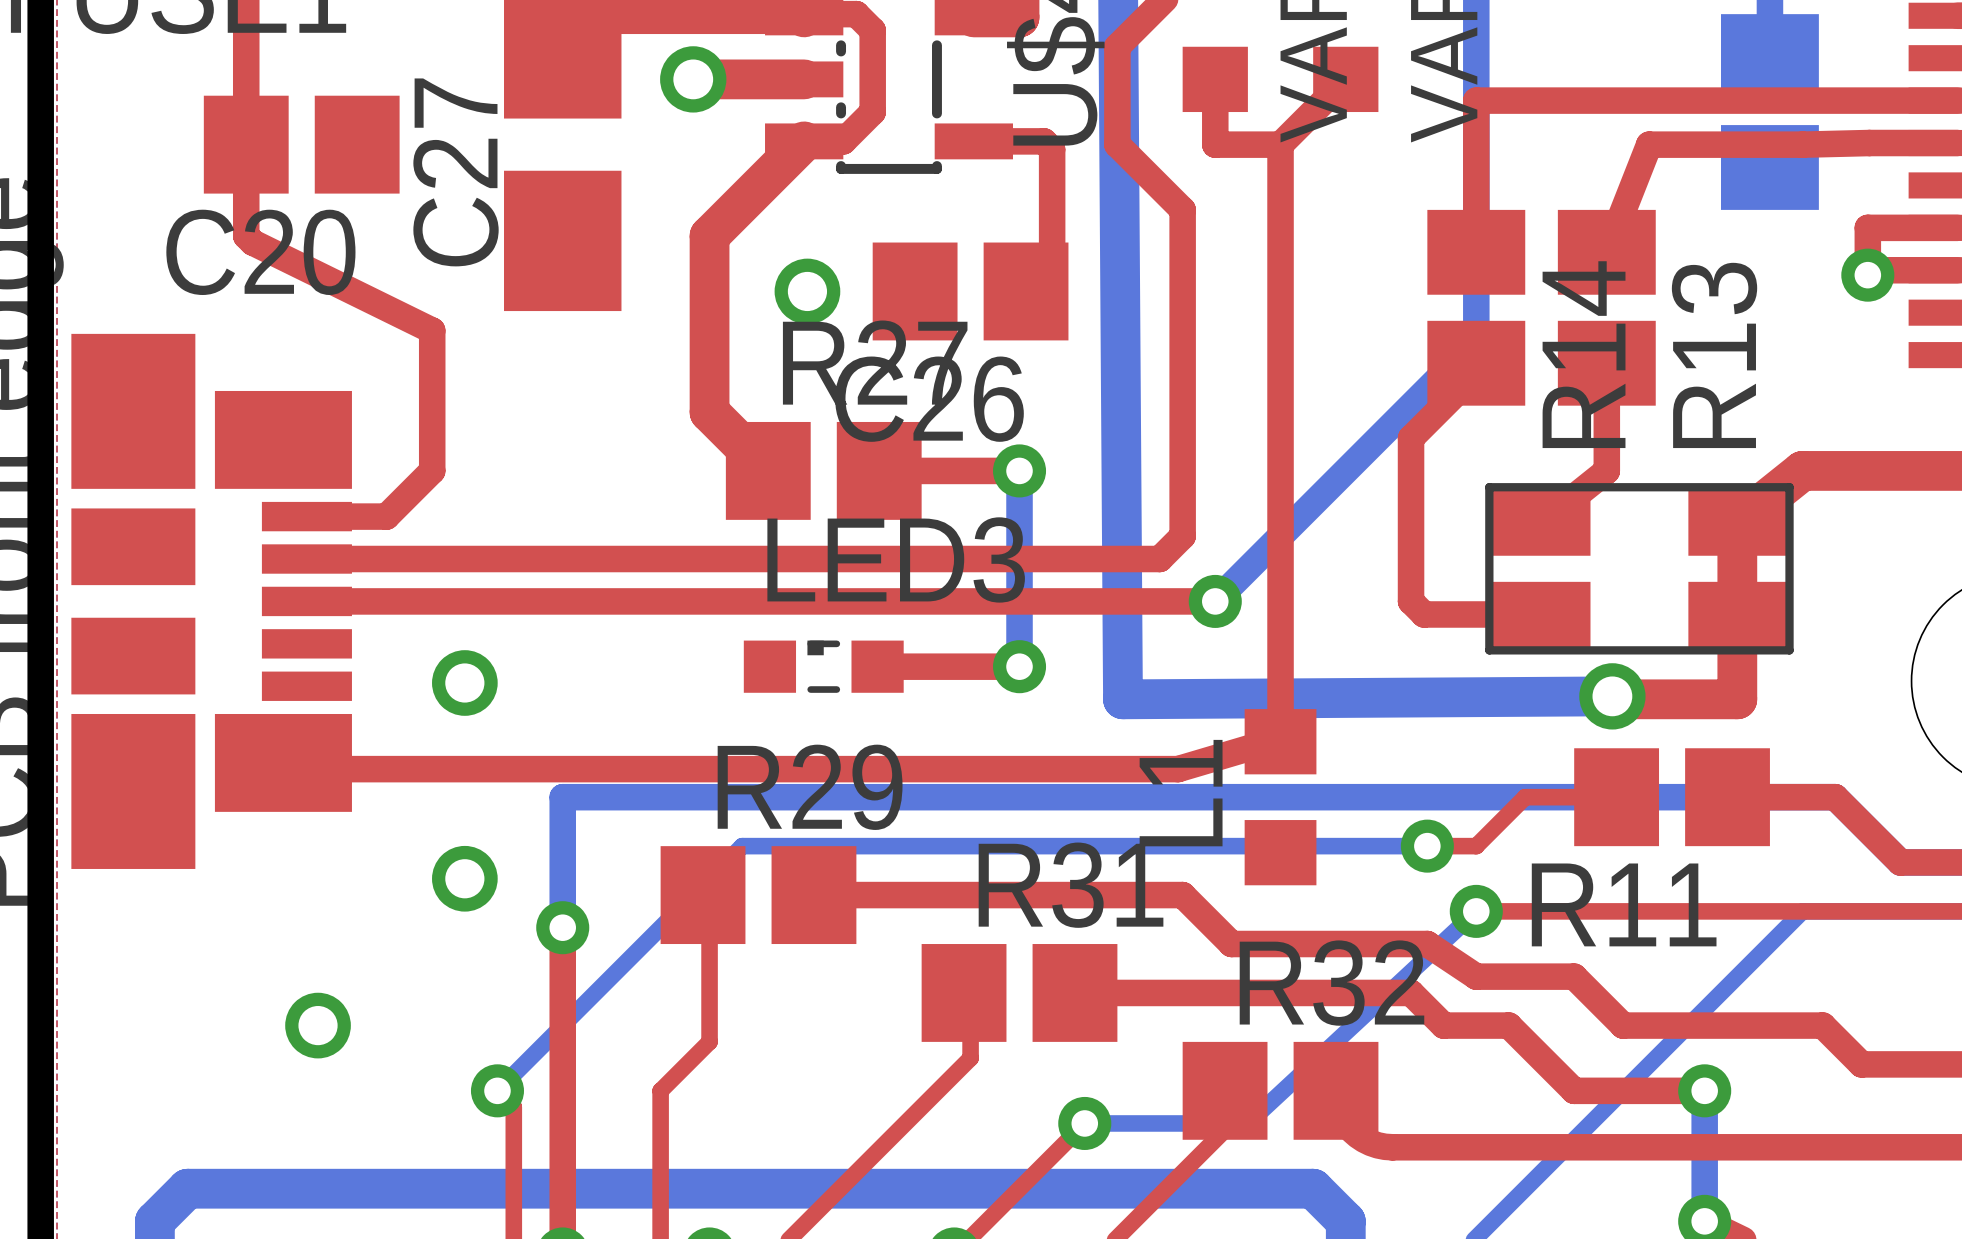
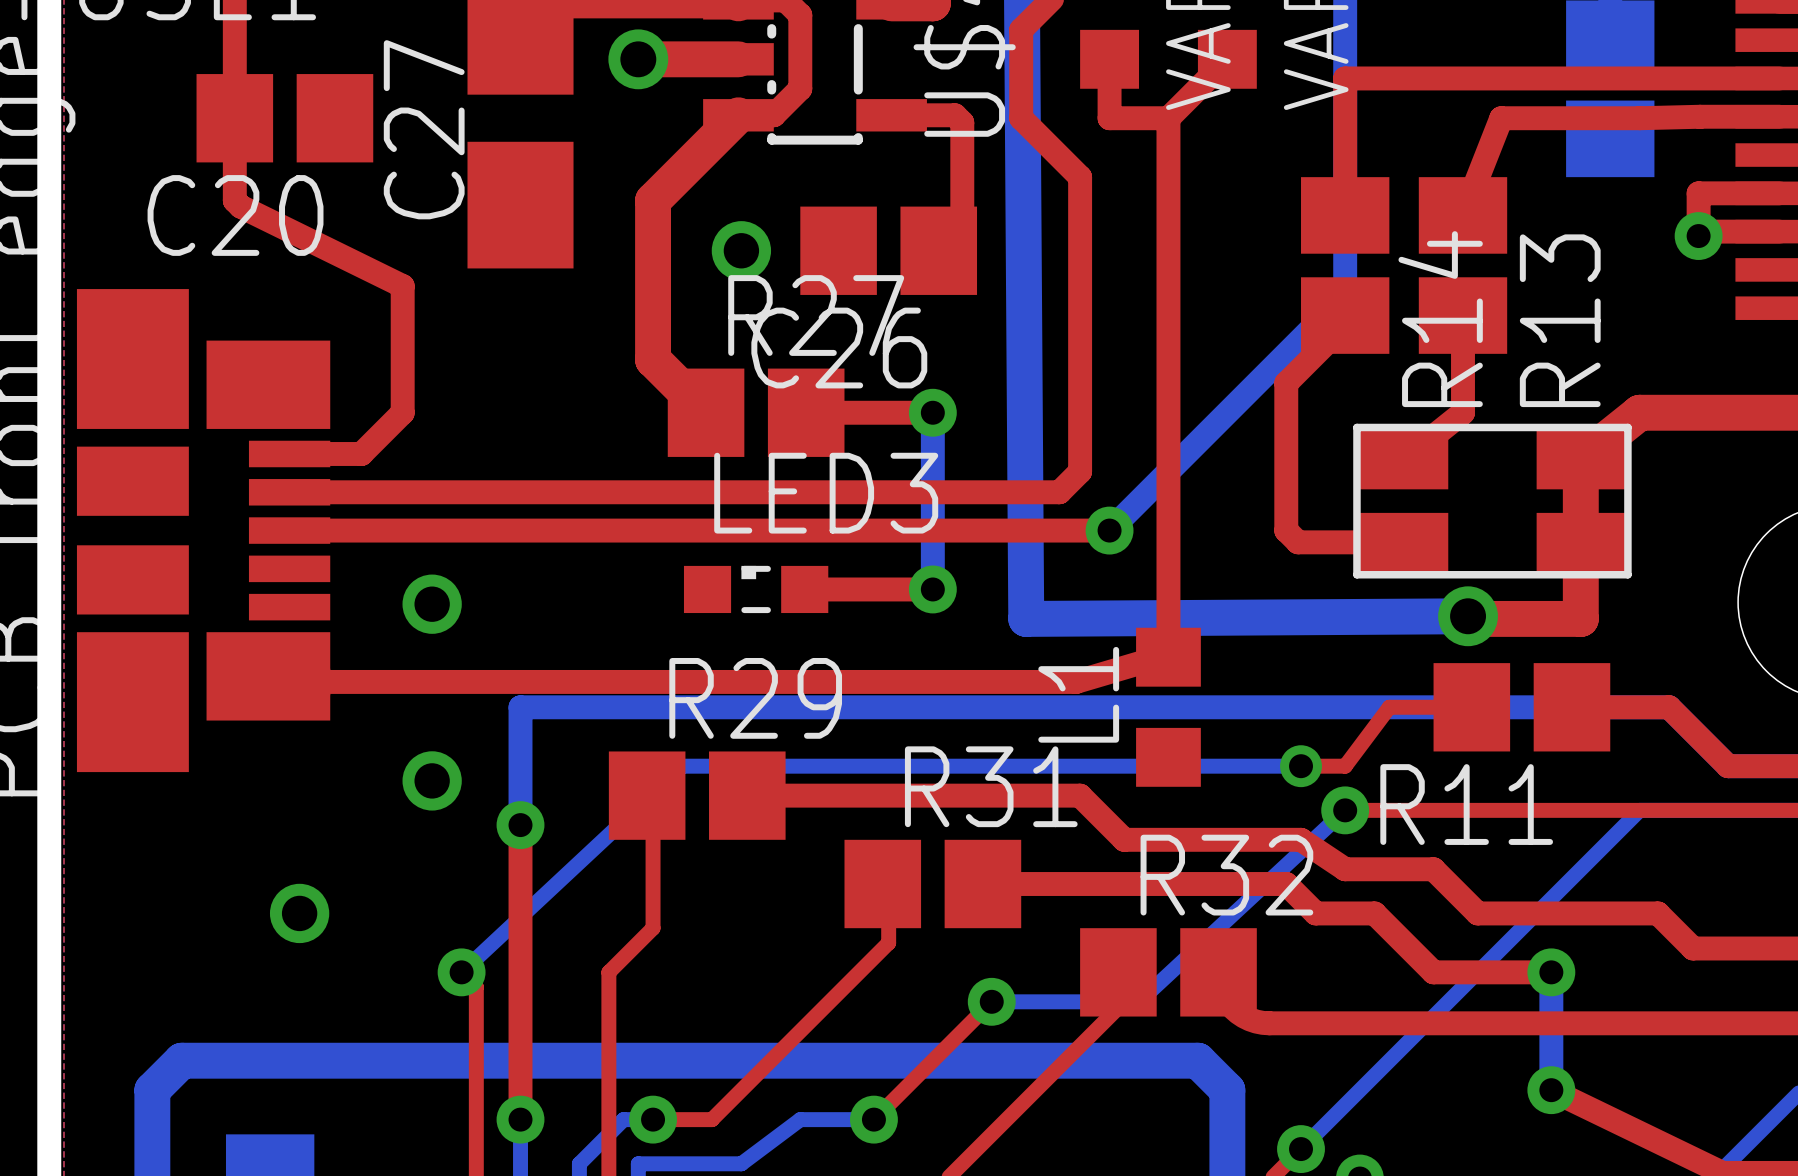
top track: (1525, 797) (1476, 846) (1427, 846) -> (1389, 707) (1345, 766) (1301, 766)
bottom track: (1427, 846) (742, 846) (497, 1090) -> (1301, 766) (682, 766) (461, 972)
via position: (1427, 846) -> (1301, 766)

